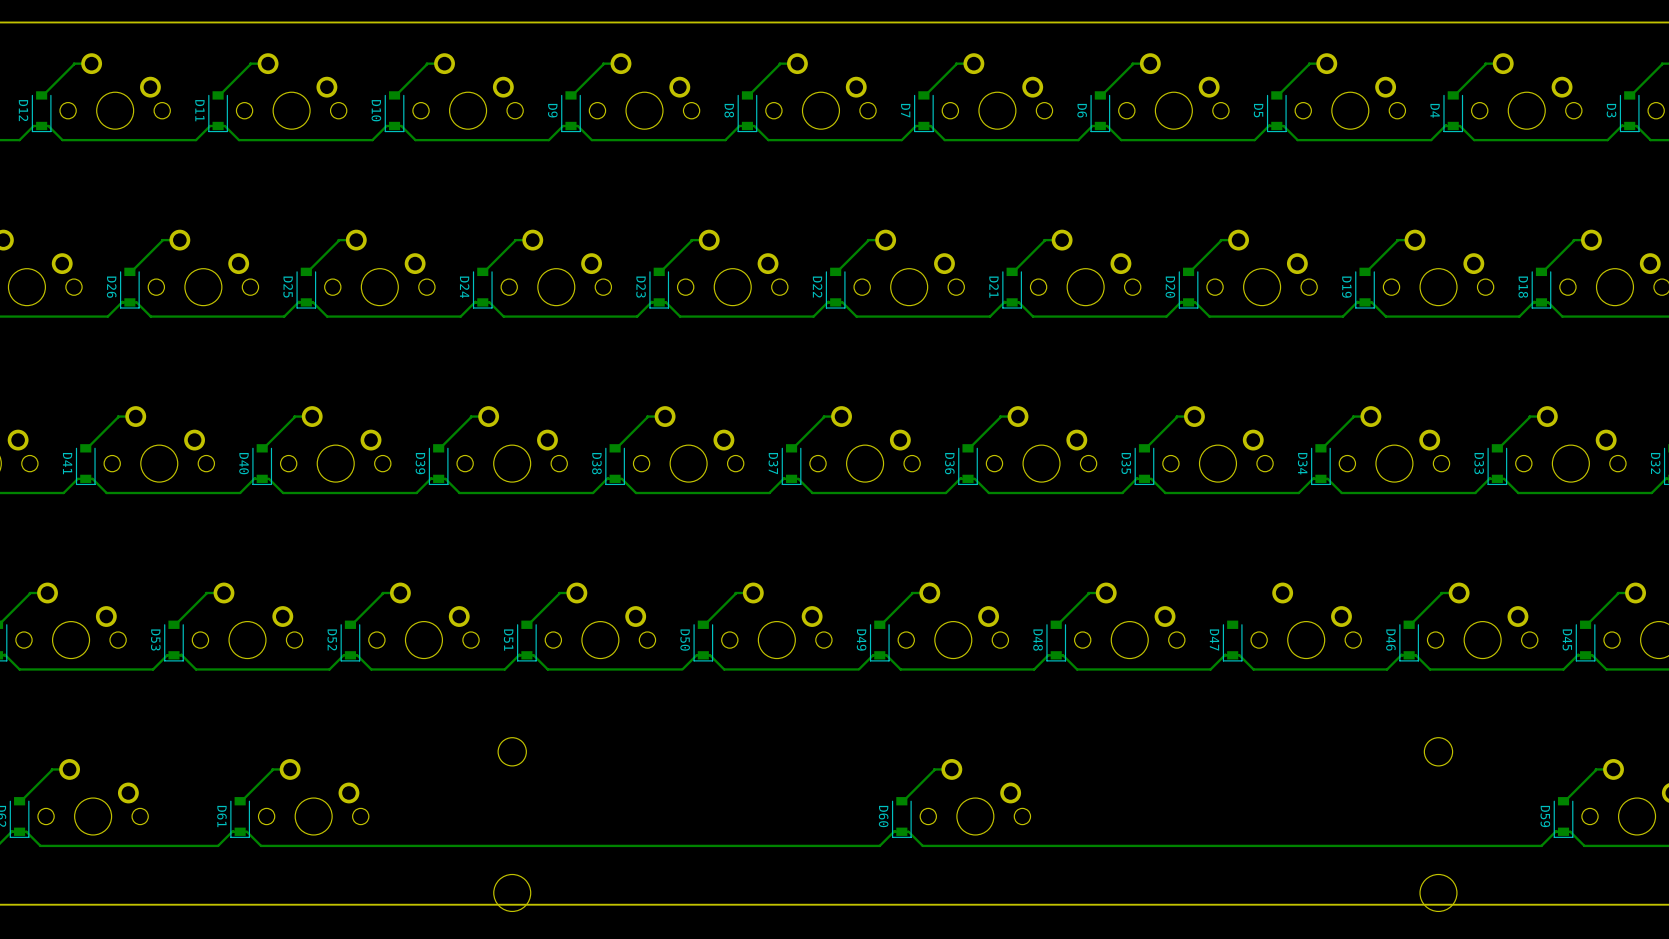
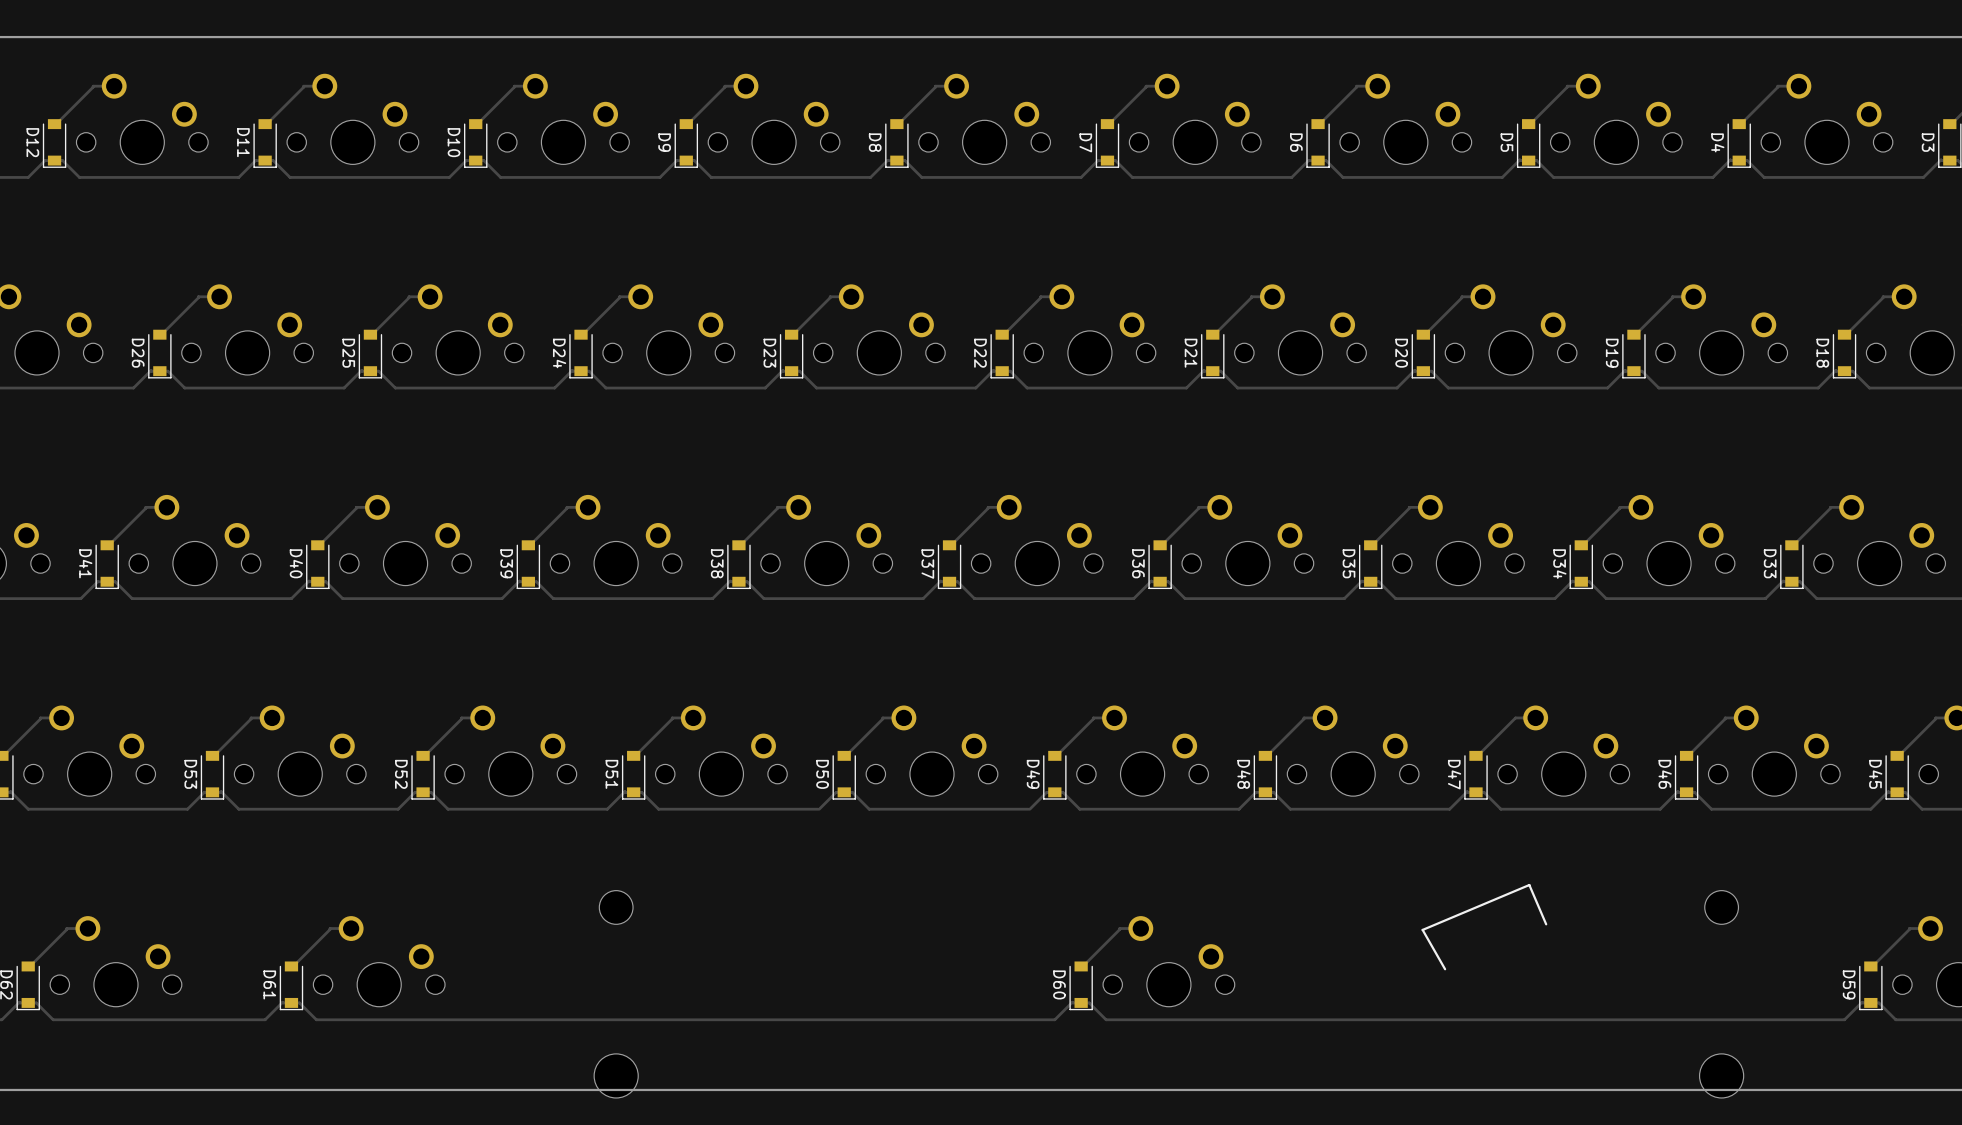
track: none -> (1535, 717) (1515, 717) (1475, 755)
line: none -> (1546, 924) (1529, 885) (1422, 929) (1445, 969)

